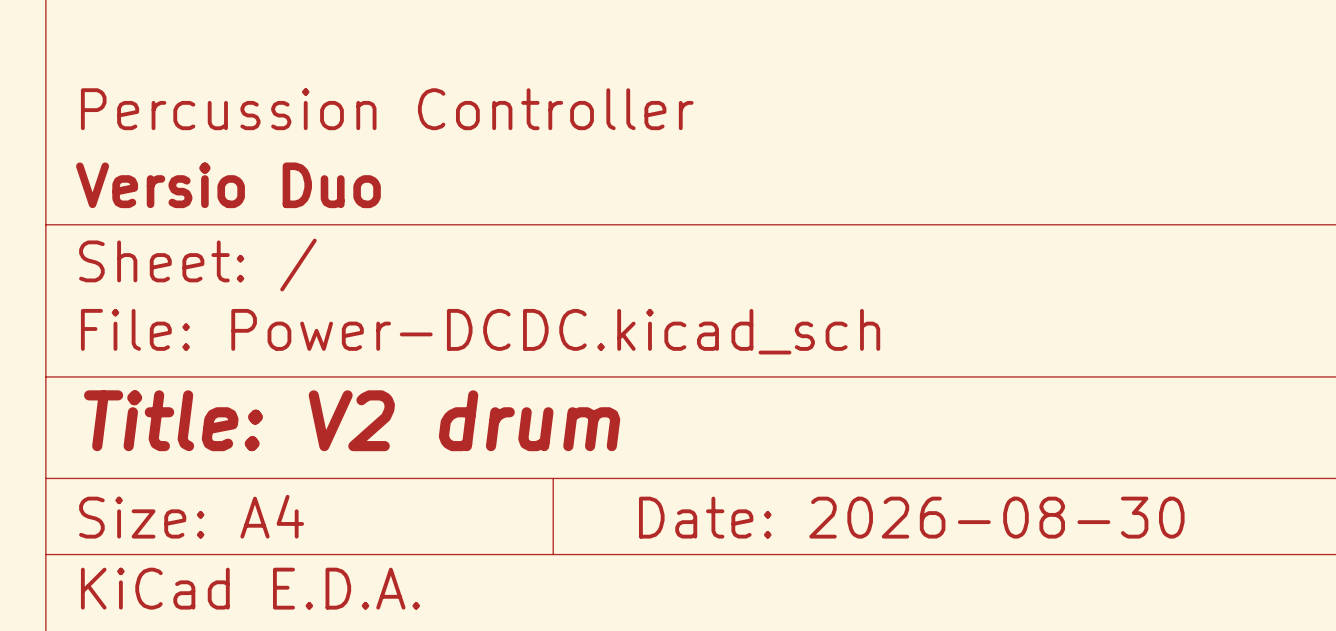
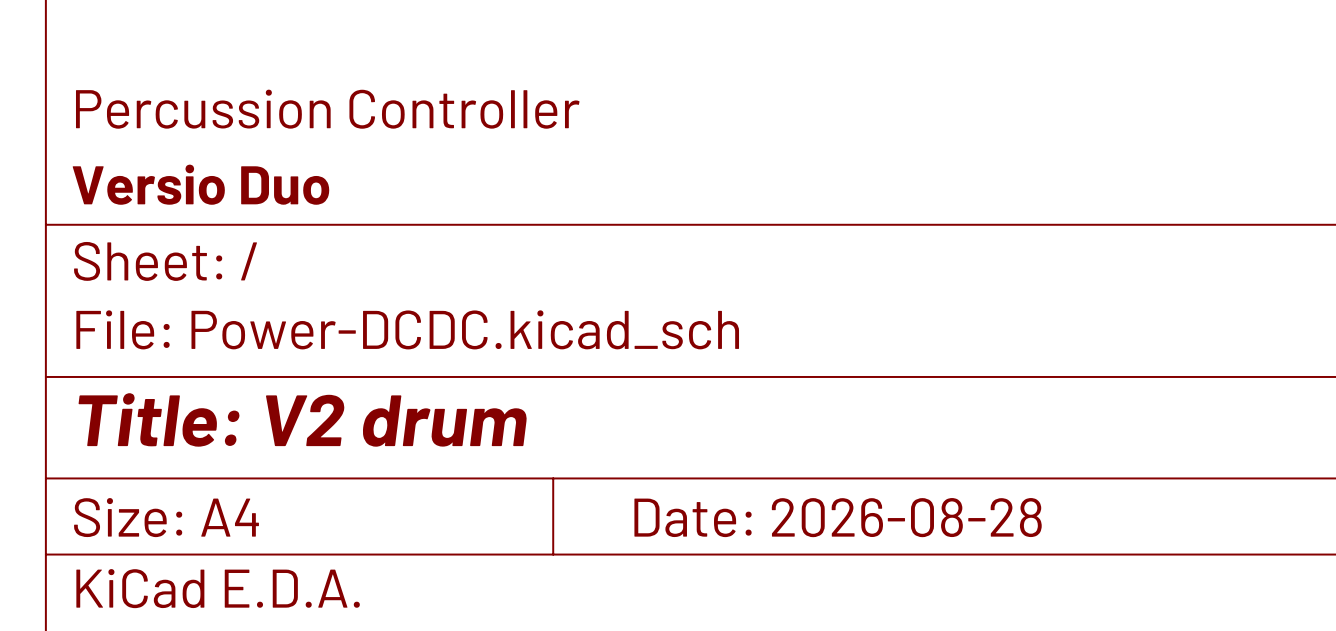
title block: Date: 2026-08-30 (911, 517) -> Date: 2026-08-28 (838, 517)

